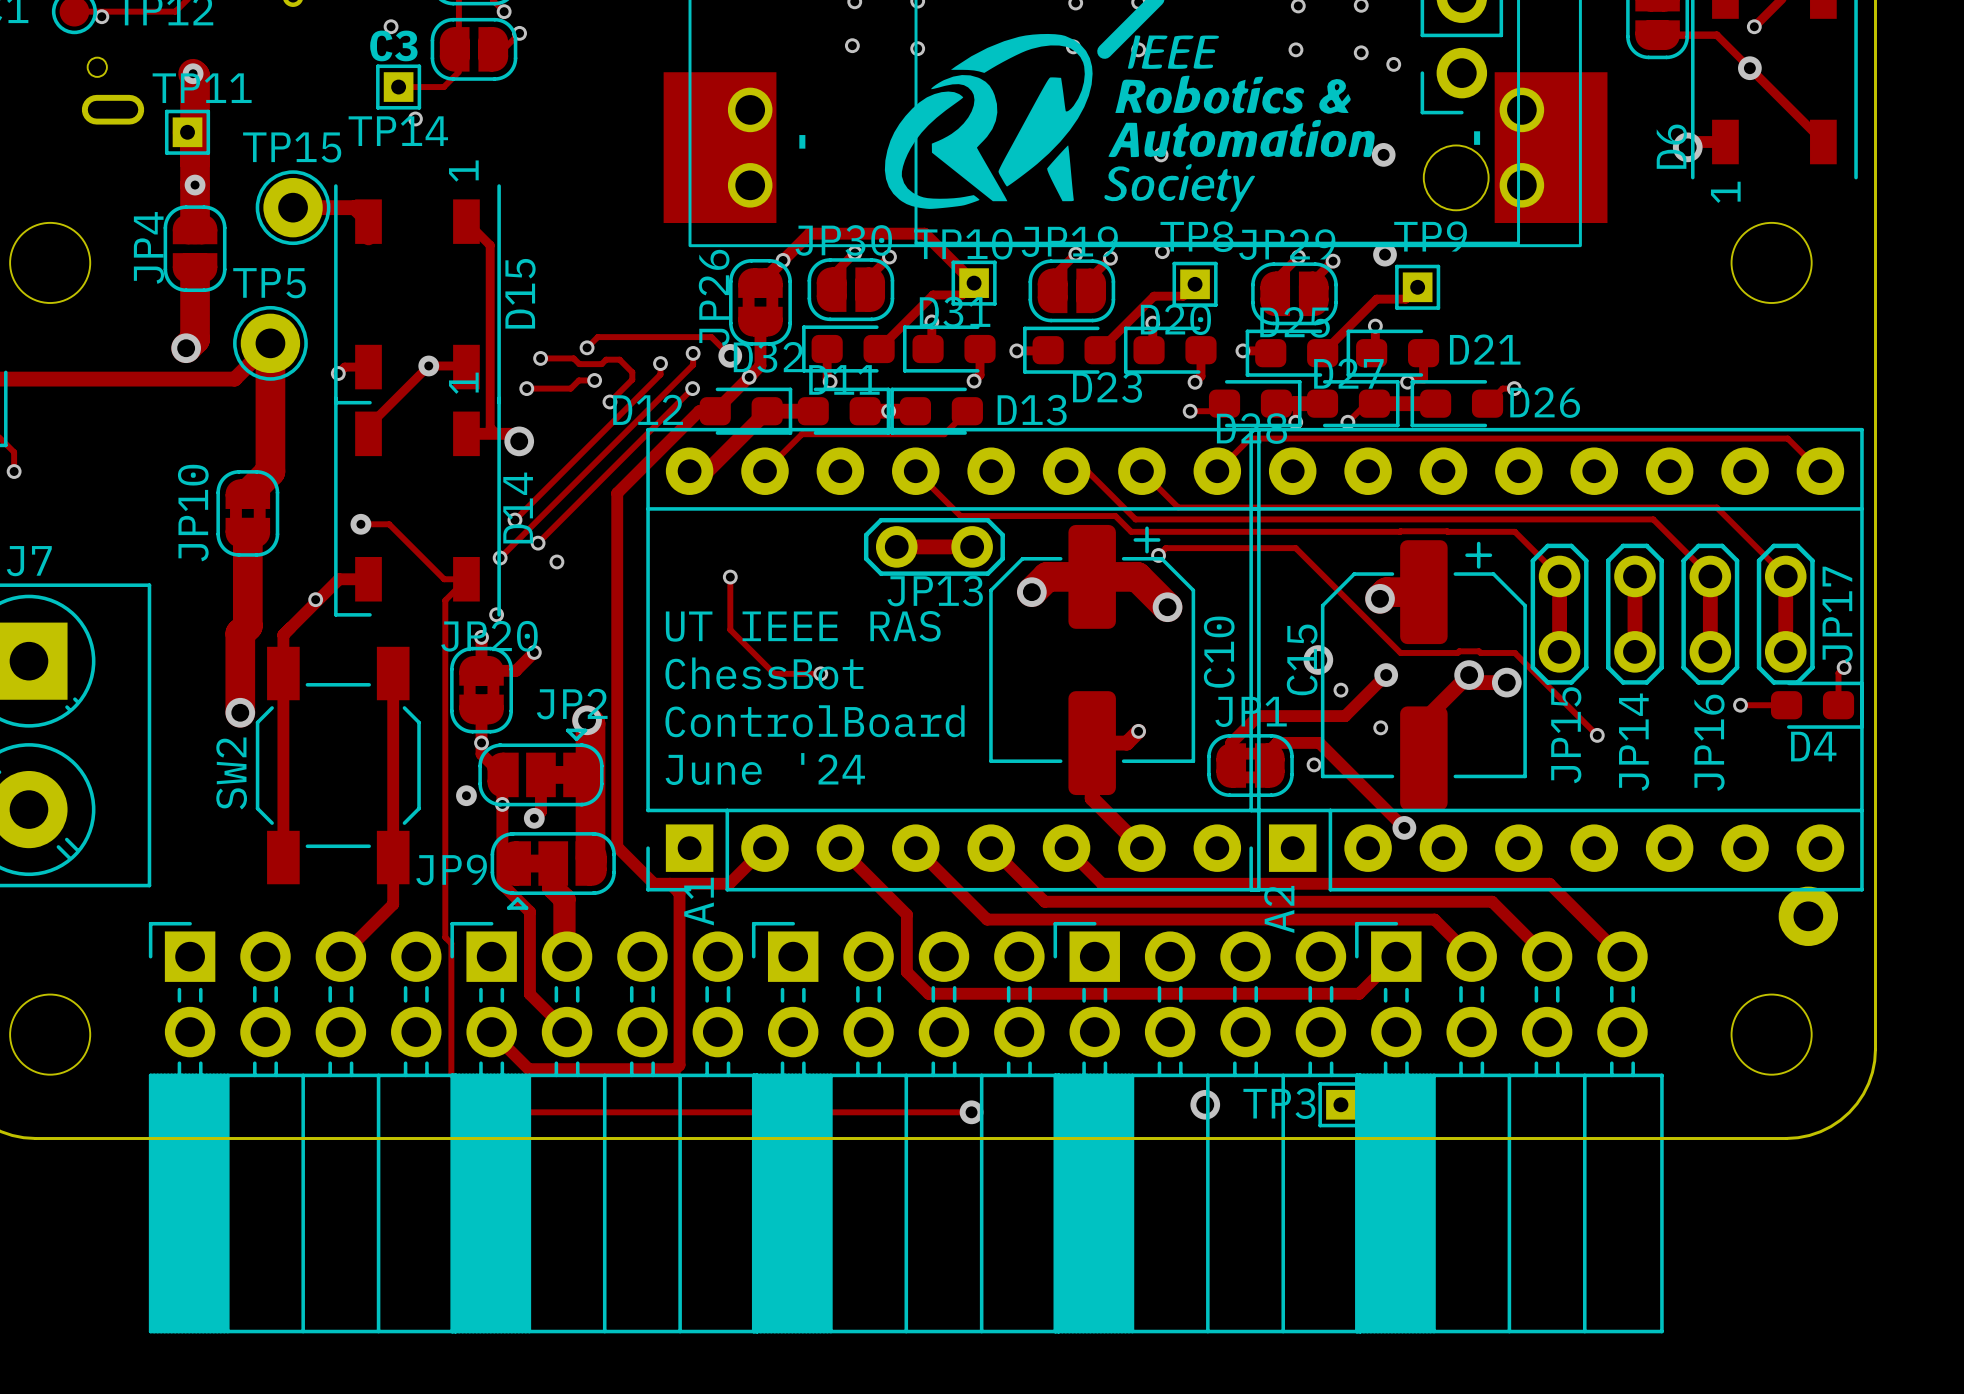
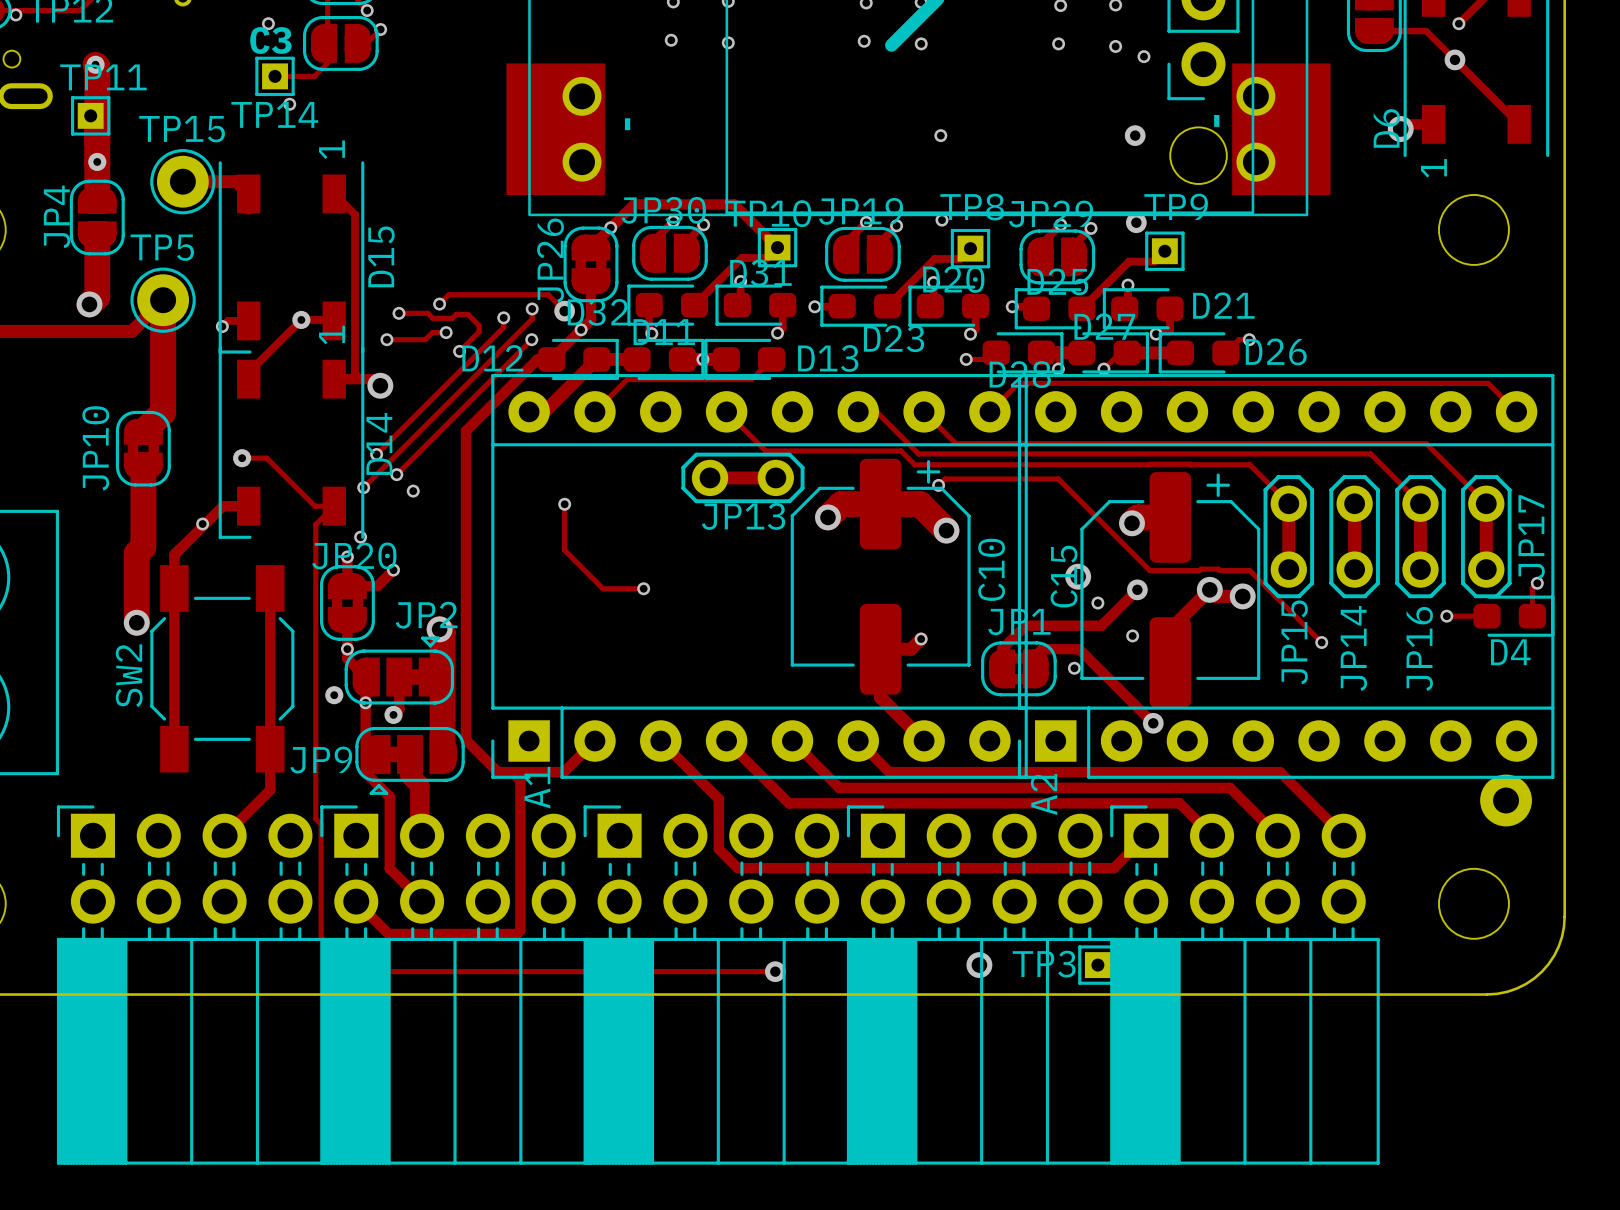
drawing: [884, 33, 1375, 212] -> none
text: UT IEEE RAS (803, 626) -> none
text: ChessBot (764, 673) -> none
text: ControlBoard (815, 721) -> none
text: June '24 (765, 769) -> none

